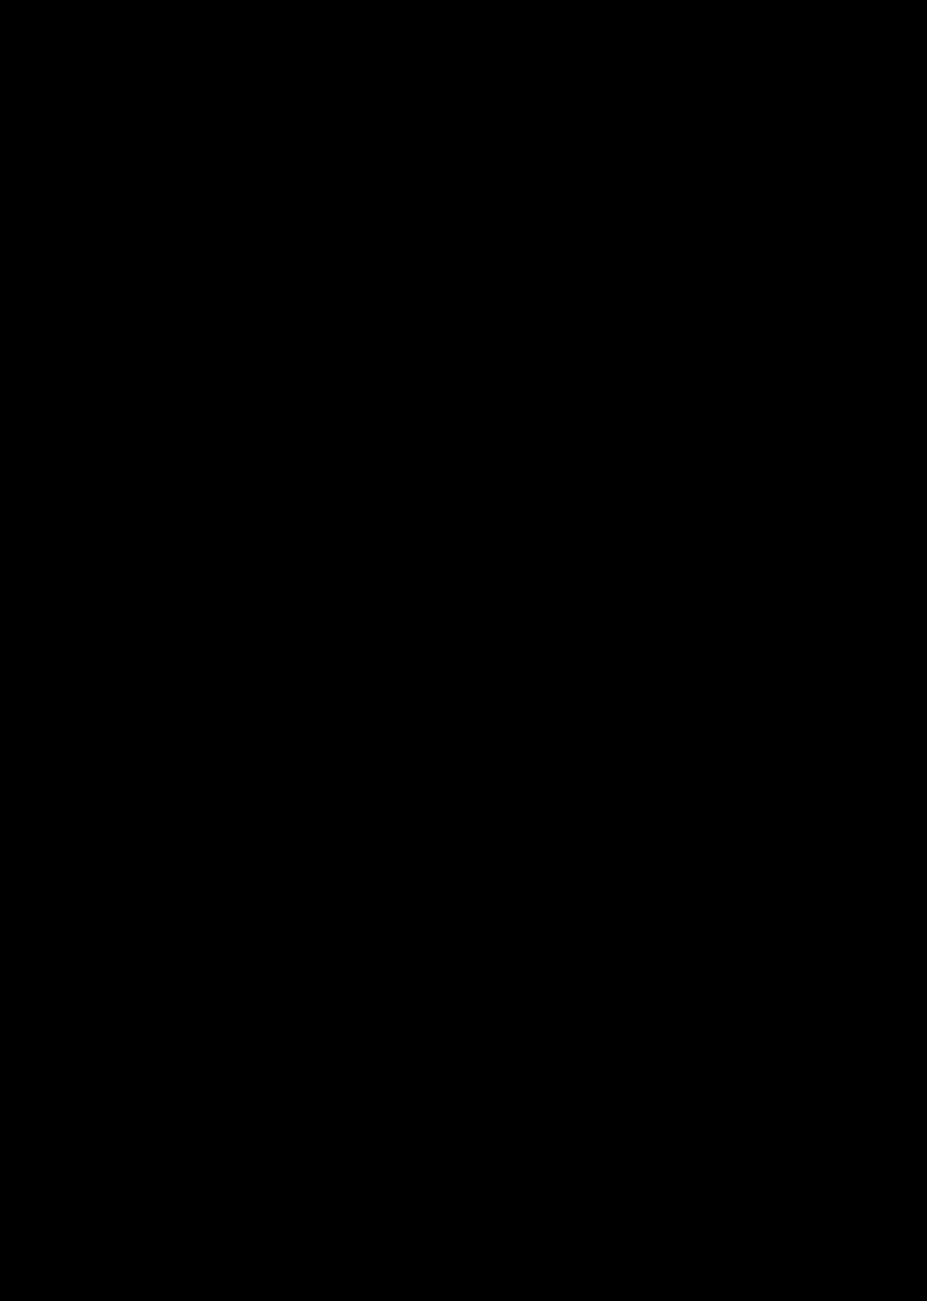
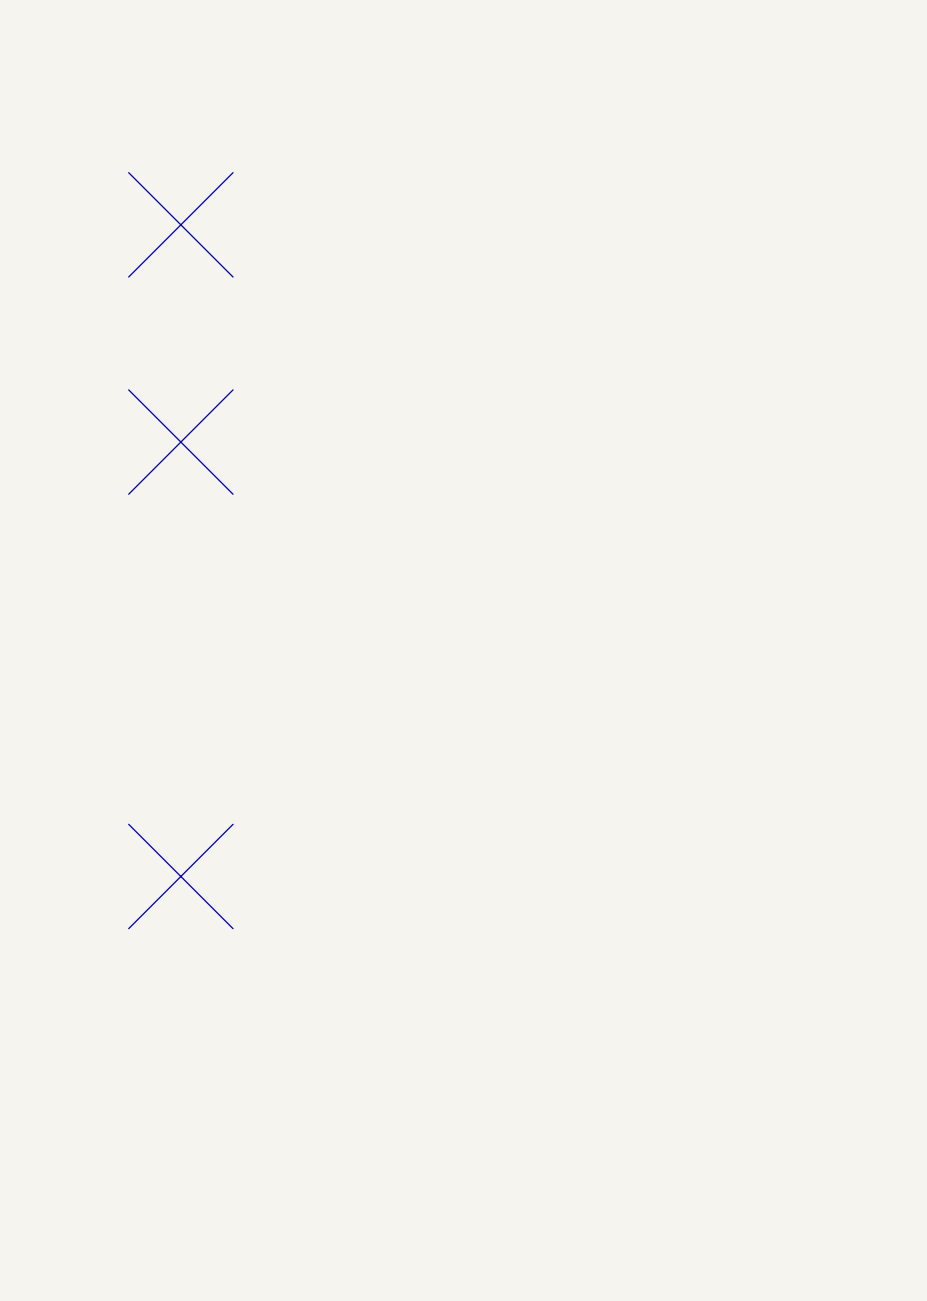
no-connect mark: none -> (180, 224)
no-connect mark: none -> (180, 442)
no-connect mark: none -> (180, 876)

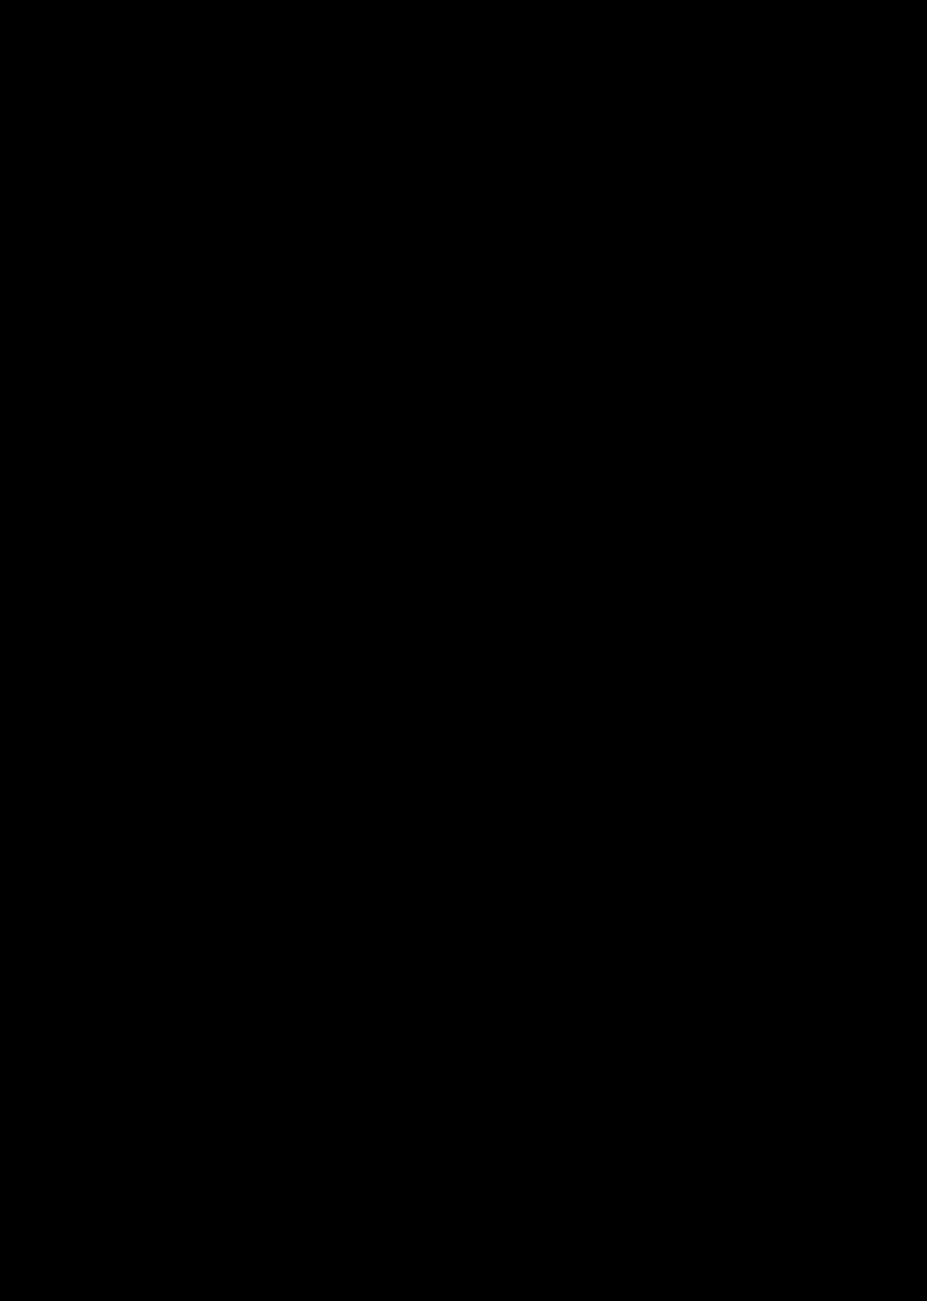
no-connect mark: (180, 224) -> none
no-connect mark: (180, 442) -> none
no-connect mark: (180, 876) -> none

